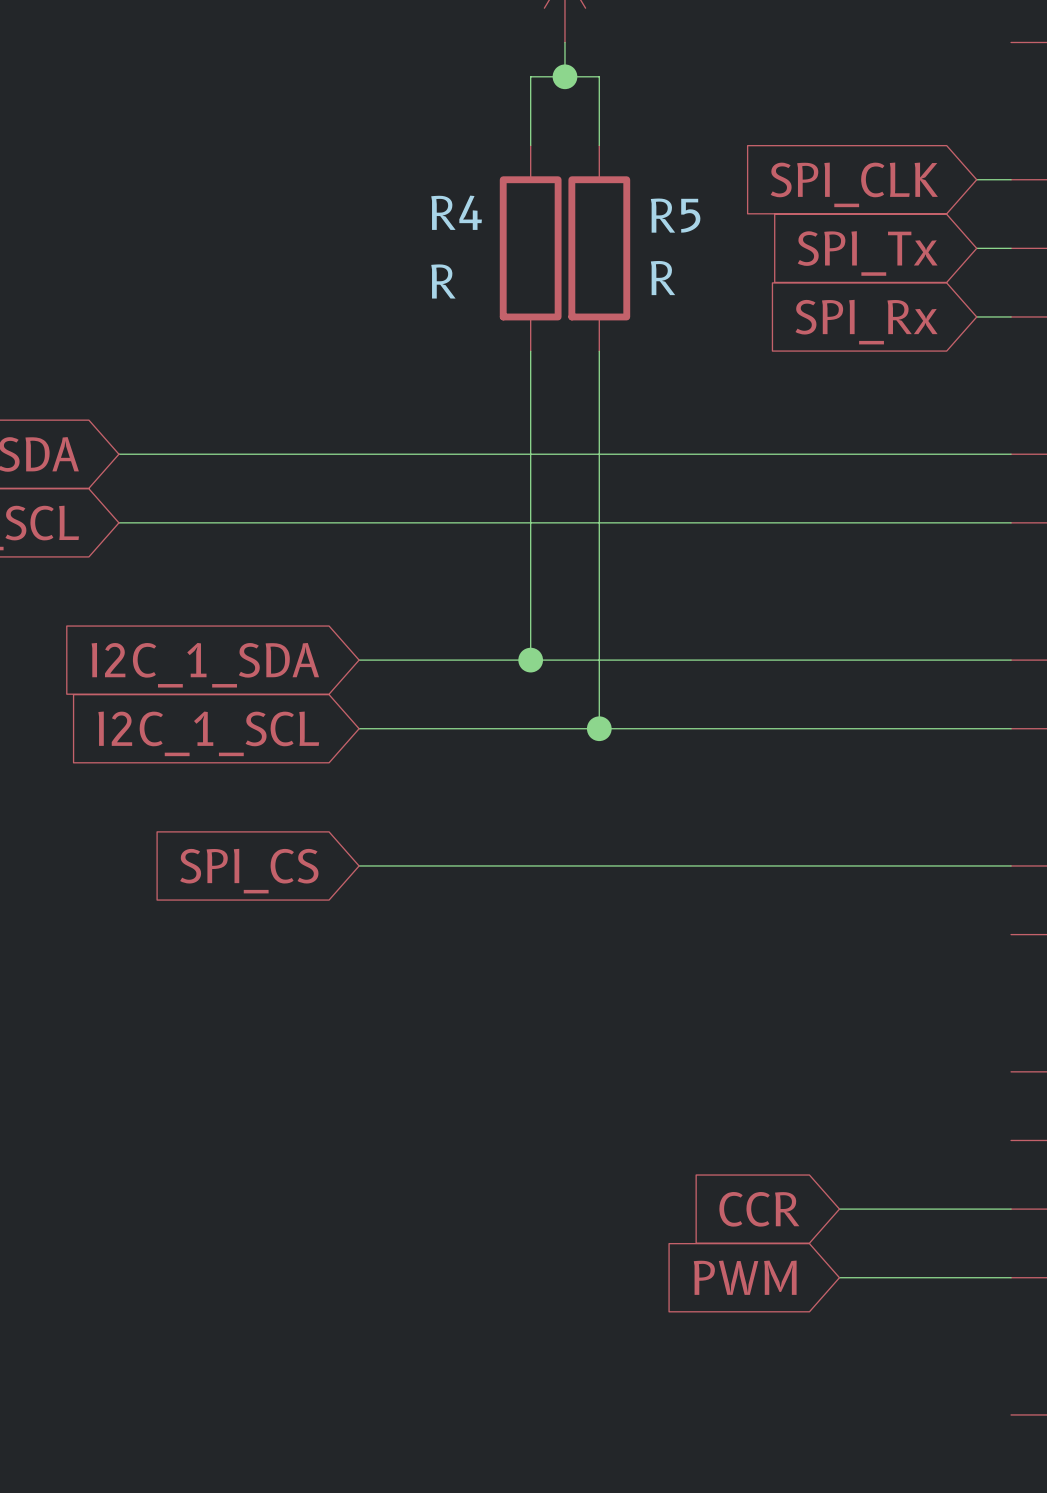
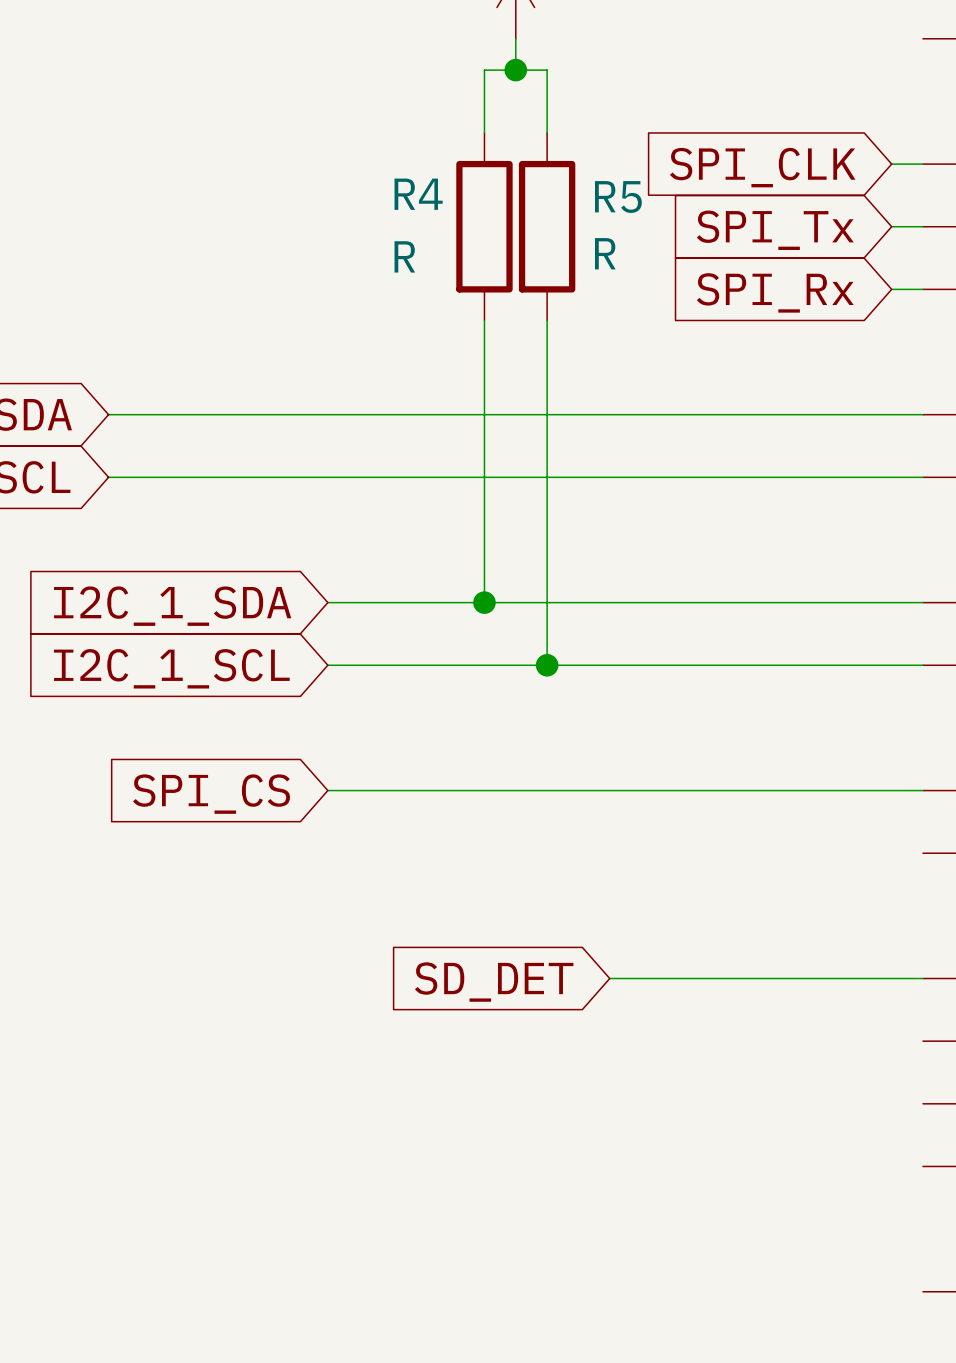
wire: none -> (609, 978) (923, 978)
global label: none -> SD_DET (494, 982)
global label: CCR (759, 1209) -> none
wire: (839, 1209) (1011, 1209) -> none
global label: PWM (745, 1277) -> none
wire: (839, 1277) (1011, 1277) -> none

